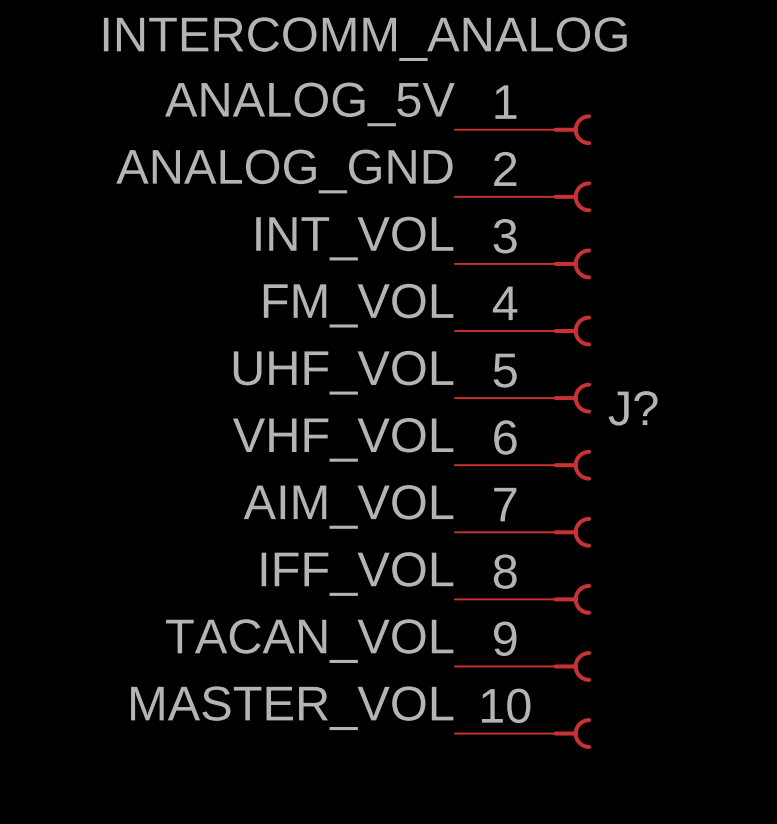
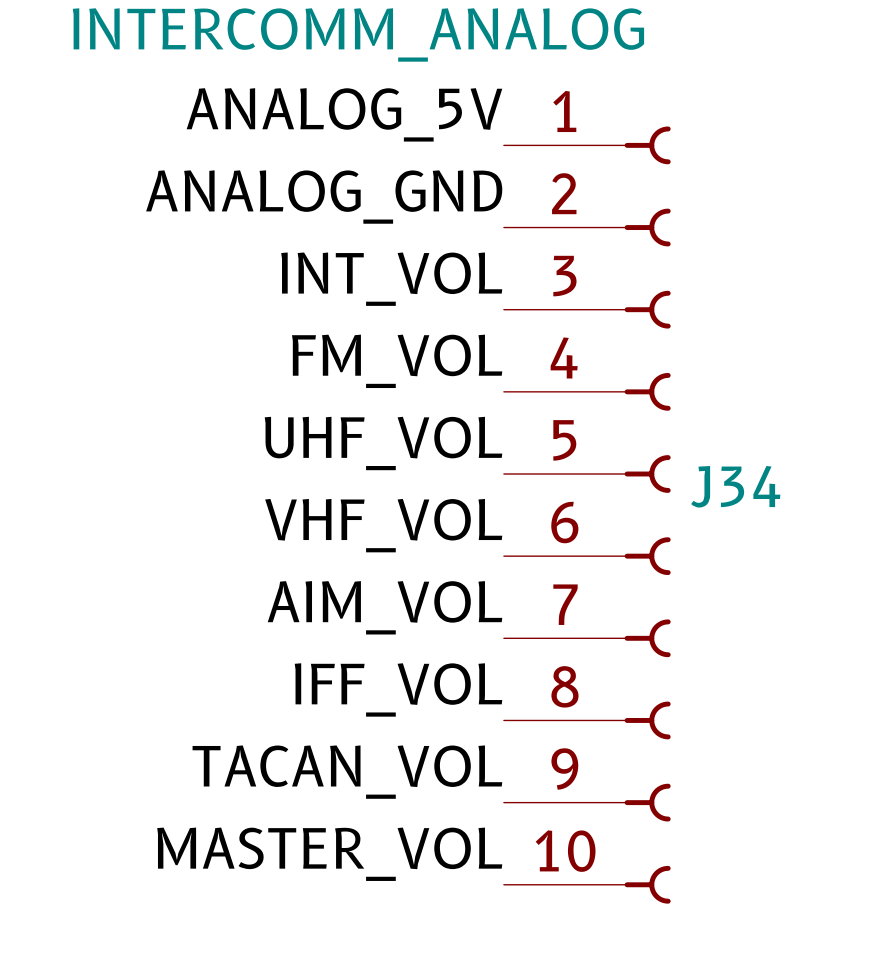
J? name: J? (633, 408) -> J34 (735, 486)

